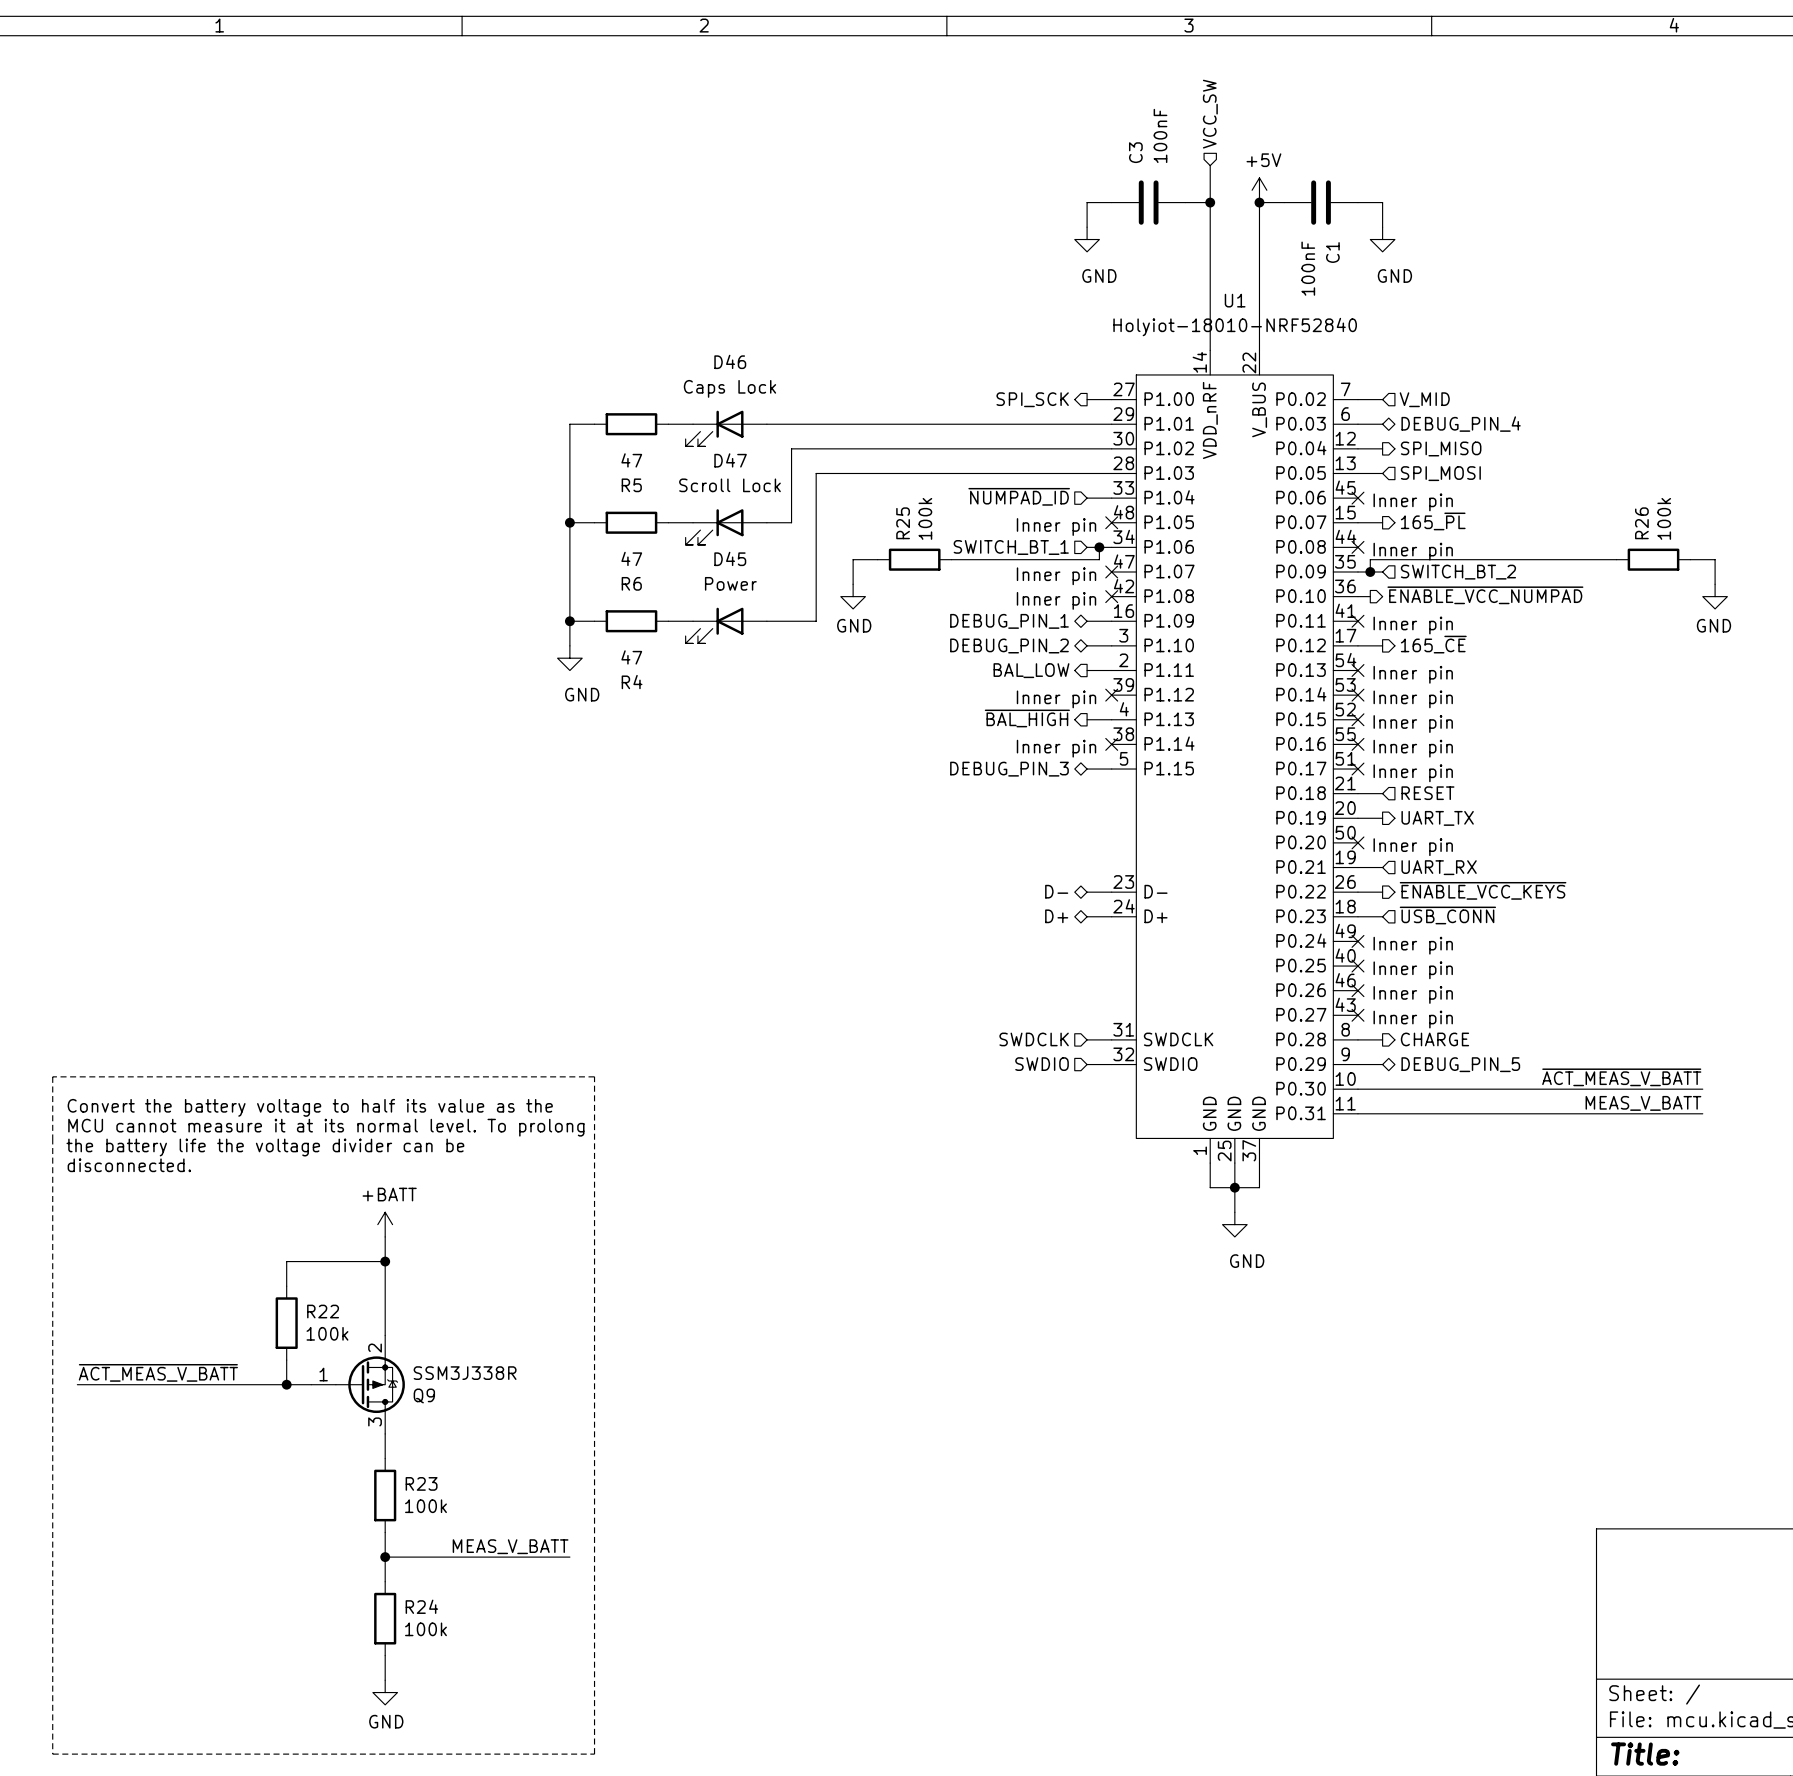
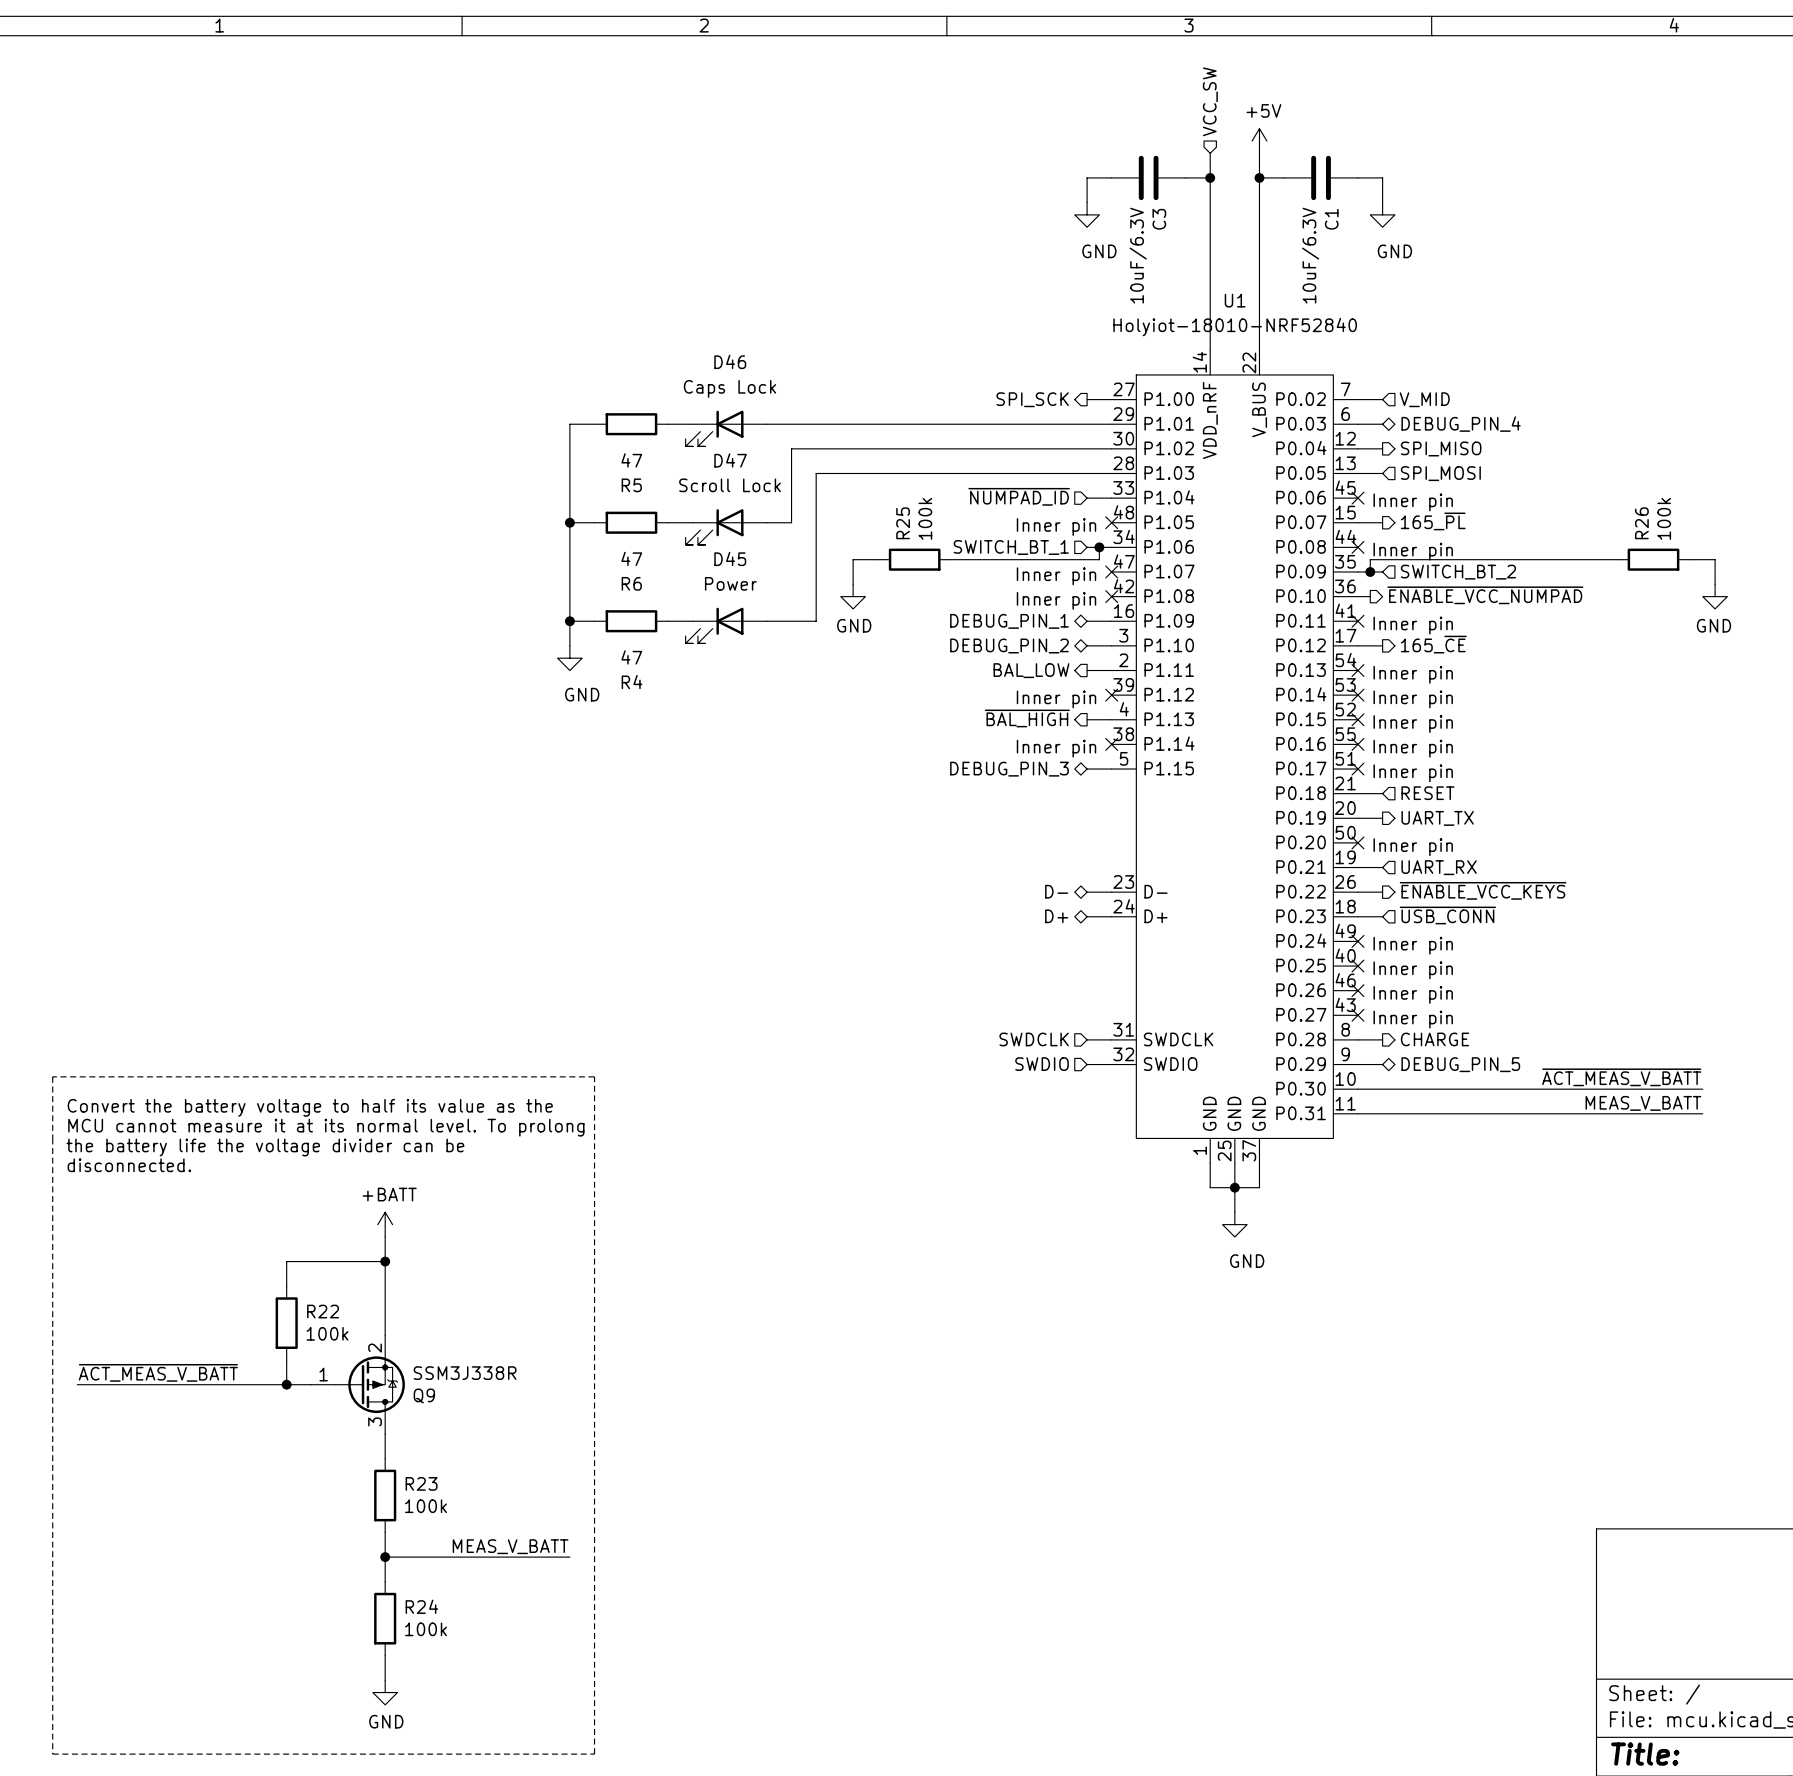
hierarchical label position: VCC_SW (1210, 114) -> VCC_SW (1210, 101)
C3 value: 100nF (1160, 135) -> 10uF/6.3V (1138, 255)
C3 name position: C3 (1135, 152) -> C3 (1159, 219)
wire: none -> (1210, 153) (1210, 165)
wire: none -> (1259, 177) (1284, 177)
power symbol position: +5V (1259, 190) -> +5V (1259, 141)
wire: (1111, 202) (1087, 202) (1087, 227) -> (1111, 177) (1087, 177) (1087, 202)
C3 position: (1148, 202) -> (1148, 177)
wire: (1185, 202) (1210, 202) -> (1185, 177) (1210, 177)
junction position: (1210, 202) -> (1210, 177)
wire: (1259, 202) (1284, 202) -> (1259, 202) (1259, 153)
junction position: (1259, 202) -> (1259, 177)
C1 position: (1321, 202) -> (1321, 177)
wire: (1357, 202) (1382, 202) (1382, 227) -> (1357, 177) (1382, 177) (1382, 202)
power symbol position: GND (1087, 239) -> GND (1087, 214)
power symbol position: GND (1382, 239) -> GND (1382, 214)
C1 name position: C1 (1332, 252) -> C1 (1331, 219)
C1 value: 100nF (1308, 268) -> 10uF/6.3V (1310, 255)

